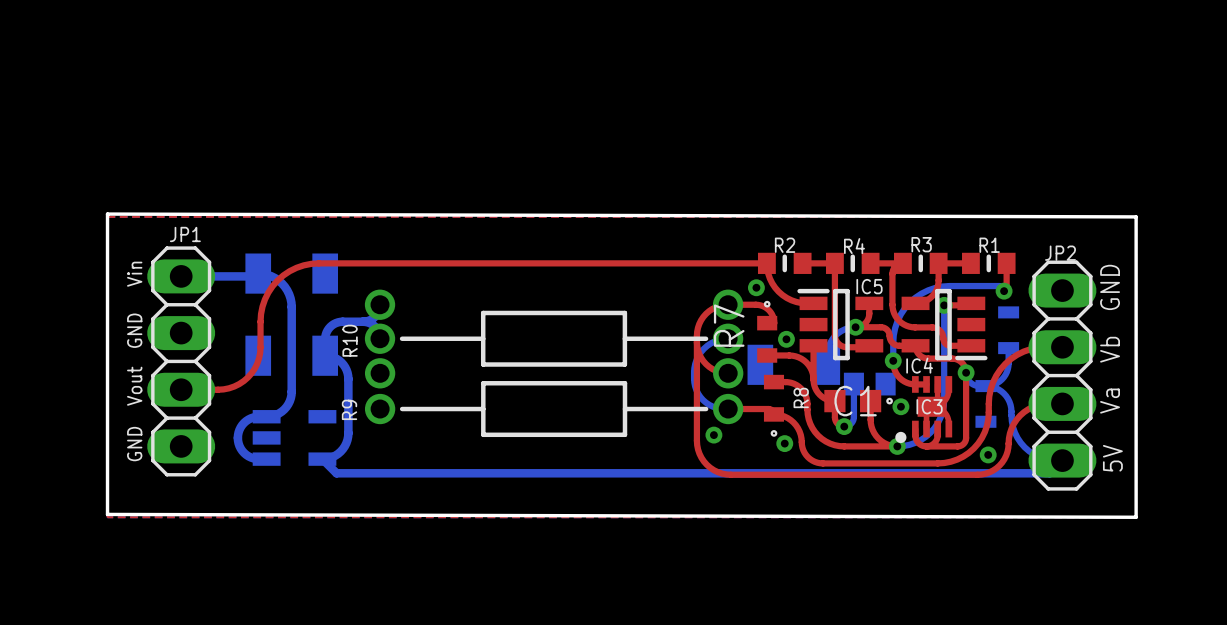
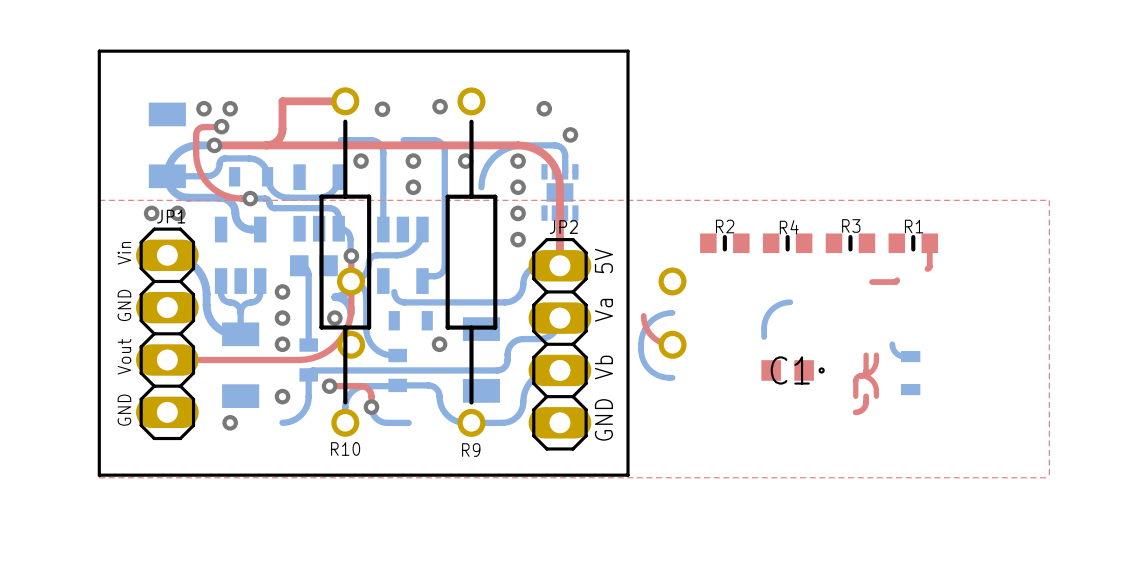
top track: none -> (345, 101) (282, 101) (281, 135) (276, 142) (266, 145)
via: none -> (440, 106)
via: none -> (204, 108)
via: none -> (230, 108)
via: none -> (544, 108)
via: none -> (382, 109)
top track: none -> (221, 126) (202, 127) (197, 130) (196, 153) (199, 170) (209, 185) (218, 192) (235, 198) (250, 198)
via: none -> (221, 126)
via: none -> (570, 134)
bottom track: none -> (340, 140) (372, 140) (378, 142) (382, 147) (383, 229)
bottom track: none -> (403, 140) (436, 140) (441, 143) (444, 149) (444, 267) (439, 274) (427, 276) (422, 281)
part: none -> (167, 145)
top track: none -> (214, 145) (518, 145) (534, 148) (547, 157) (558, 176) (559, 265)
bottom track: none -> (214, 145) (194, 145) (182, 149) (171, 160) (167, 176)
via: none -> (214, 145)
via: none -> (361, 161)
via: none -> (413, 161)
via: none -> (465, 161)
via: none -> (518, 161)
bottom track: none -> (565, 171) (564, 153) (559, 146) (517, 145) (507, 148) (493, 157) (484, 171) (481, 187)
bottom track: none -> (167, 176) (210, 175) (217, 171) (222, 158) (251, 158) (263, 165) (269, 184) (273, 191) (280, 196) (288, 197) (326, 196) (335, 187) (338, 177)
bottom track: none -> (167, 176) (170, 187) (178, 194) (185, 197) (225, 198) (233, 205) (236, 219) (240, 224) (247, 228) (260, 229)
part: none -> (251, 176)
via: none -> (413, 187)
via: none -> (518, 187)
board edge: (107, 214) (1136, 216) (1136, 517) (107, 514) -> (99, 197) (99, 51) (628, 51) (628, 475) (99, 475)
bottom track: none -> (250, 198) (266, 198) (273, 208) (334, 209) (338, 214) (338, 228) (345, 230) (349, 235) (351, 256)
via: none -> (250, 198)
via: none -> (151, 213)
via: none -> (177, 213)
via: none -> (518, 213)
bottom track: none -> (422, 229) (419, 242) (412, 249) (400, 255) (372, 256) (363, 276) (350, 281) (360, 284) (365, 293) (366, 332) (369, 342) (382, 353) (397, 355)
JP2 name position: JP2 (1060, 253) -> JP2 (563, 227)
via: none -> (518, 239)
top track: (802, 263) (834, 263) (835, 339) (839, 344) (845, 347) (869, 345) -> none
top track: (870, 263) (902, 263) (895, 266) (892, 273) (892, 307) (895, 316) (901, 322) (912, 327) (936, 328) (941, 331) (944, 342) (948, 345) (971, 345) -> none
top track: (970, 263) (938, 263) (938, 283) (935, 291) (927, 300) (915, 303) -> none
part: (291, 273) -> none
bottom track: (181, 276) (255, 276) (258, 273) (262, 273) (278, 280) (289, 294) (291, 307) (291, 391) (289, 401) (284, 409) (276, 414) (248, 419) (242, 425) (238, 435) (239, 446) (246, 454) (253, 458) (266, 459) -> (167, 255) (182, 258) (198, 270) (205, 284) (208, 316) (218, 328) (228, 333) (240, 334) (240, 312)
via: none -> (351, 256)
bottom track: none -> (299, 265) (305, 267) (308, 273) (308, 345)
bottom track: none -> (559, 265) (539, 265) (530, 269) (524, 277) (519, 295) (507, 302) (403, 302) (397, 299) (394, 292)
via: (756, 287) -> none
text position: GND (1110, 287) -> GND (603, 419)
bottom track: (1004, 291) (999, 286) (949, 286) (935, 287) (921, 293) (904, 308) (897, 321) (893, 335) (893, 360) -> none
via: (1004, 291) -> none
top track: (813, 303) (796, 302) (782, 295) (769, 278) (766, 263) (311, 263) (289, 271) (272, 286) (262, 306) (260, 352) (254, 368) (239, 384) (218, 389) -> (351, 256) (349, 321) (344, 333) (330, 349) (319, 356) (305, 359) (201, 359)
top track: (869, 303) (867, 320) (862, 325) (855, 327) (884, 327) (888, 331) (890, 340) (895, 345) (915, 345) (917, 352) (923, 357) (955, 359) (965, 367) (966, 437) (964, 443) (958, 446) (923, 446) (916, 439) (915, 429) -> none
bottom track: none -> (221, 281) (222, 297) (226, 301) (236, 304) (240, 312)
bottom track: none -> (260, 281) (259, 297) (254, 301) (244, 304) (240, 312)
bottom track: (944, 305) (942, 411) (937, 423) (925, 436) (909, 444) (897, 446) -> none
via: (944, 305) -> none
via: none -> (282, 291)
bottom track: (363, 321) (336, 323) (328, 328) (325, 336) (325, 355) (339, 360) (345, 367) (348, 375) (347, 439) (338, 453) (322, 459) (336, 473) (1049, 473) (1062, 460) (1039, 457) (1024, 447) (1014, 432) (1008, 398) (998, 389) (985, 386) (997, 383) (1005, 374) (1008, 366) (1008, 348) -> none
top track: (767, 323) (774, 323) (773, 318) (770, 311) (762, 306) (724, 305) (712, 308) (706, 313) (697, 327) (697, 445) (701, 457) (706, 464) (722, 473) (985, 473) (996, 468) (1004, 459) (1011, 428) (1020, 415) (1038, 405) (1062, 403) -> none
IC5 side: top (840, 324) -> bottom (319, 202)
IC4 side: top (944, 324) -> bottom (402, 255)
via: (855, 327) -> none
part: (1008, 330) -> none
R7: (767, 331) -> none
R10 rotation: 0° (554, 338) -> 90° clockwise (345, 262)
via: (786, 339) -> none
R10 name position: R10 (350, 340) -> R10 (345, 448)
via: none -> (282, 318)
via: none -> (334, 318)
bottom track: none -> (559, 318) (557, 328) (549, 336) (541, 338) (521, 339) (513, 342) (508, 350) (506, 365) (499, 370) (311, 370) (308, 374) (308, 400) (305, 409) (295, 419) (282, 422)
top track: (813, 345) (813, 379) -> none
part: none -> (410, 320)
top track: (1062, 347) (1030, 349) (1017, 354) (1005, 363) (996, 375) (990, 389) (988, 419) (981, 437) (968, 452) (957, 459) (944, 462) (817, 462) (810, 459) (804, 452) (799, 431) (787, 418) (773, 414) (769, 409) (728, 409) -> none
text position: Vb (1110, 349) -> Vb (603, 367)
part rotation: 0° (291, 355) -> 90° clockwise (240, 365)
top track: (767, 355) (792, 355) (801, 358) (810, 367) (813, 379) -> none
top track: (893, 360) (894, 370) (901, 379) (912, 384) (926, 384) -> none
via: (893, 360) -> none
part: (793, 364) -> none
via: none -> (282, 344)
via: none -> (439, 344)
via: (966, 372) -> none
JP2 position: (1062, 375) -> (559, 344)
top track: (813, 379) (815, 387) (819, 394) (826, 399) (834, 401) (835, 420) (838, 424) (844, 426) -> none
top track: (773, 382) (791, 382) (802, 390) (806, 398) (810, 423) (818, 435) (825, 441) (839, 446) (897, 446) (883, 442) (874, 433) (870, 423) (870, 401) -> none
bottom track: (853, 384) (853, 419) (850, 424) (844, 426) -> none
part position: (869, 384) -> (313, 265)
part: none -> (308, 359)
part: none -> (481, 359)
part: none -> (397, 370)
bottom track: none -> (559, 370) (546, 371) (532, 379) (525, 389) (520, 412) (515, 418) (507, 422) (459, 422) (444, 412) (440, 403) (438, 392) (433, 386) (397, 385) (363, 386) (353, 390) (346, 401) (345, 422)
text position: Va (1110, 401) -> Va (603, 310)
R8: (773, 405) -> none
via: (900, 406) -> none
R9 name position: R9 (349, 409) -> R9 (471, 450)
R9 rotation: 0° (554, 409) -> 90° clockwise (471, 262)
IC3 side: top (923, 409) -> bottom (559, 192)
top track: none -> (329, 386) (366, 387) (371, 393) (371, 407)
via: none -> (329, 386)
via: (844, 426) -> none
via: none -> (282, 396)
via: (713, 435) -> none
part rotation: 0° (294, 437) -> 90° counterclockwise (240, 255)
part position: (294, 437) -> (240, 255)
bottom track: none -> (371, 407) (374, 416) (381, 421) (408, 422)
via: none -> (371, 407)
via: (784, 443) -> none
via: (897, 446) -> none
via: (988, 454) -> none
via: none -> (230, 422)
text position: 5V (1112, 458) -> 5V (603, 261)

